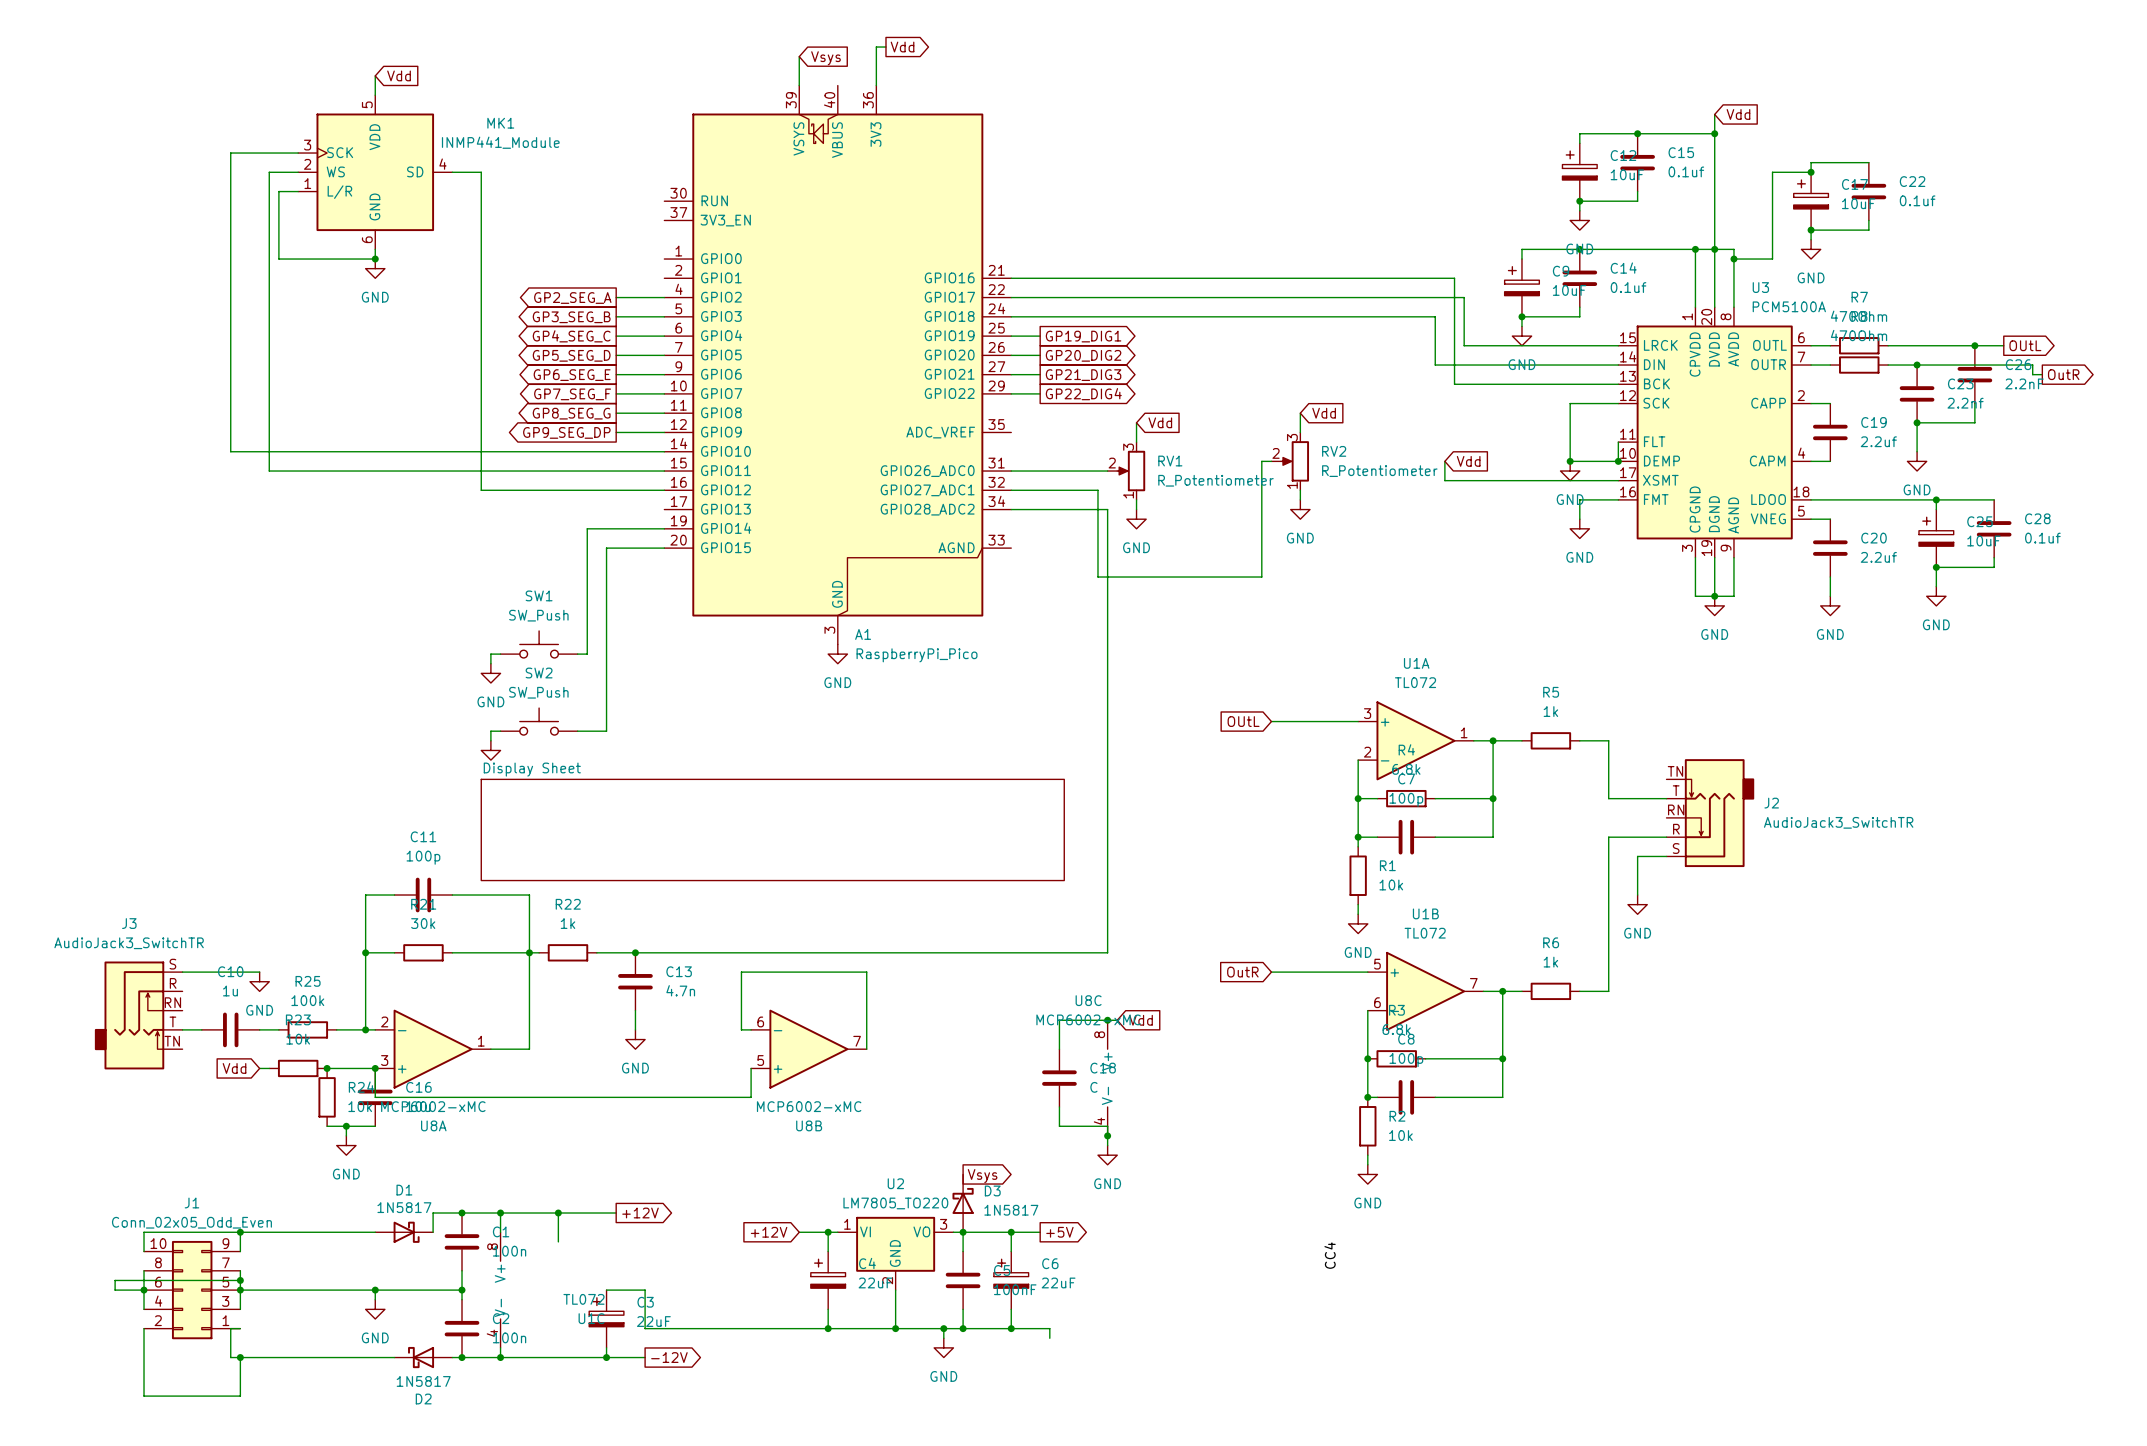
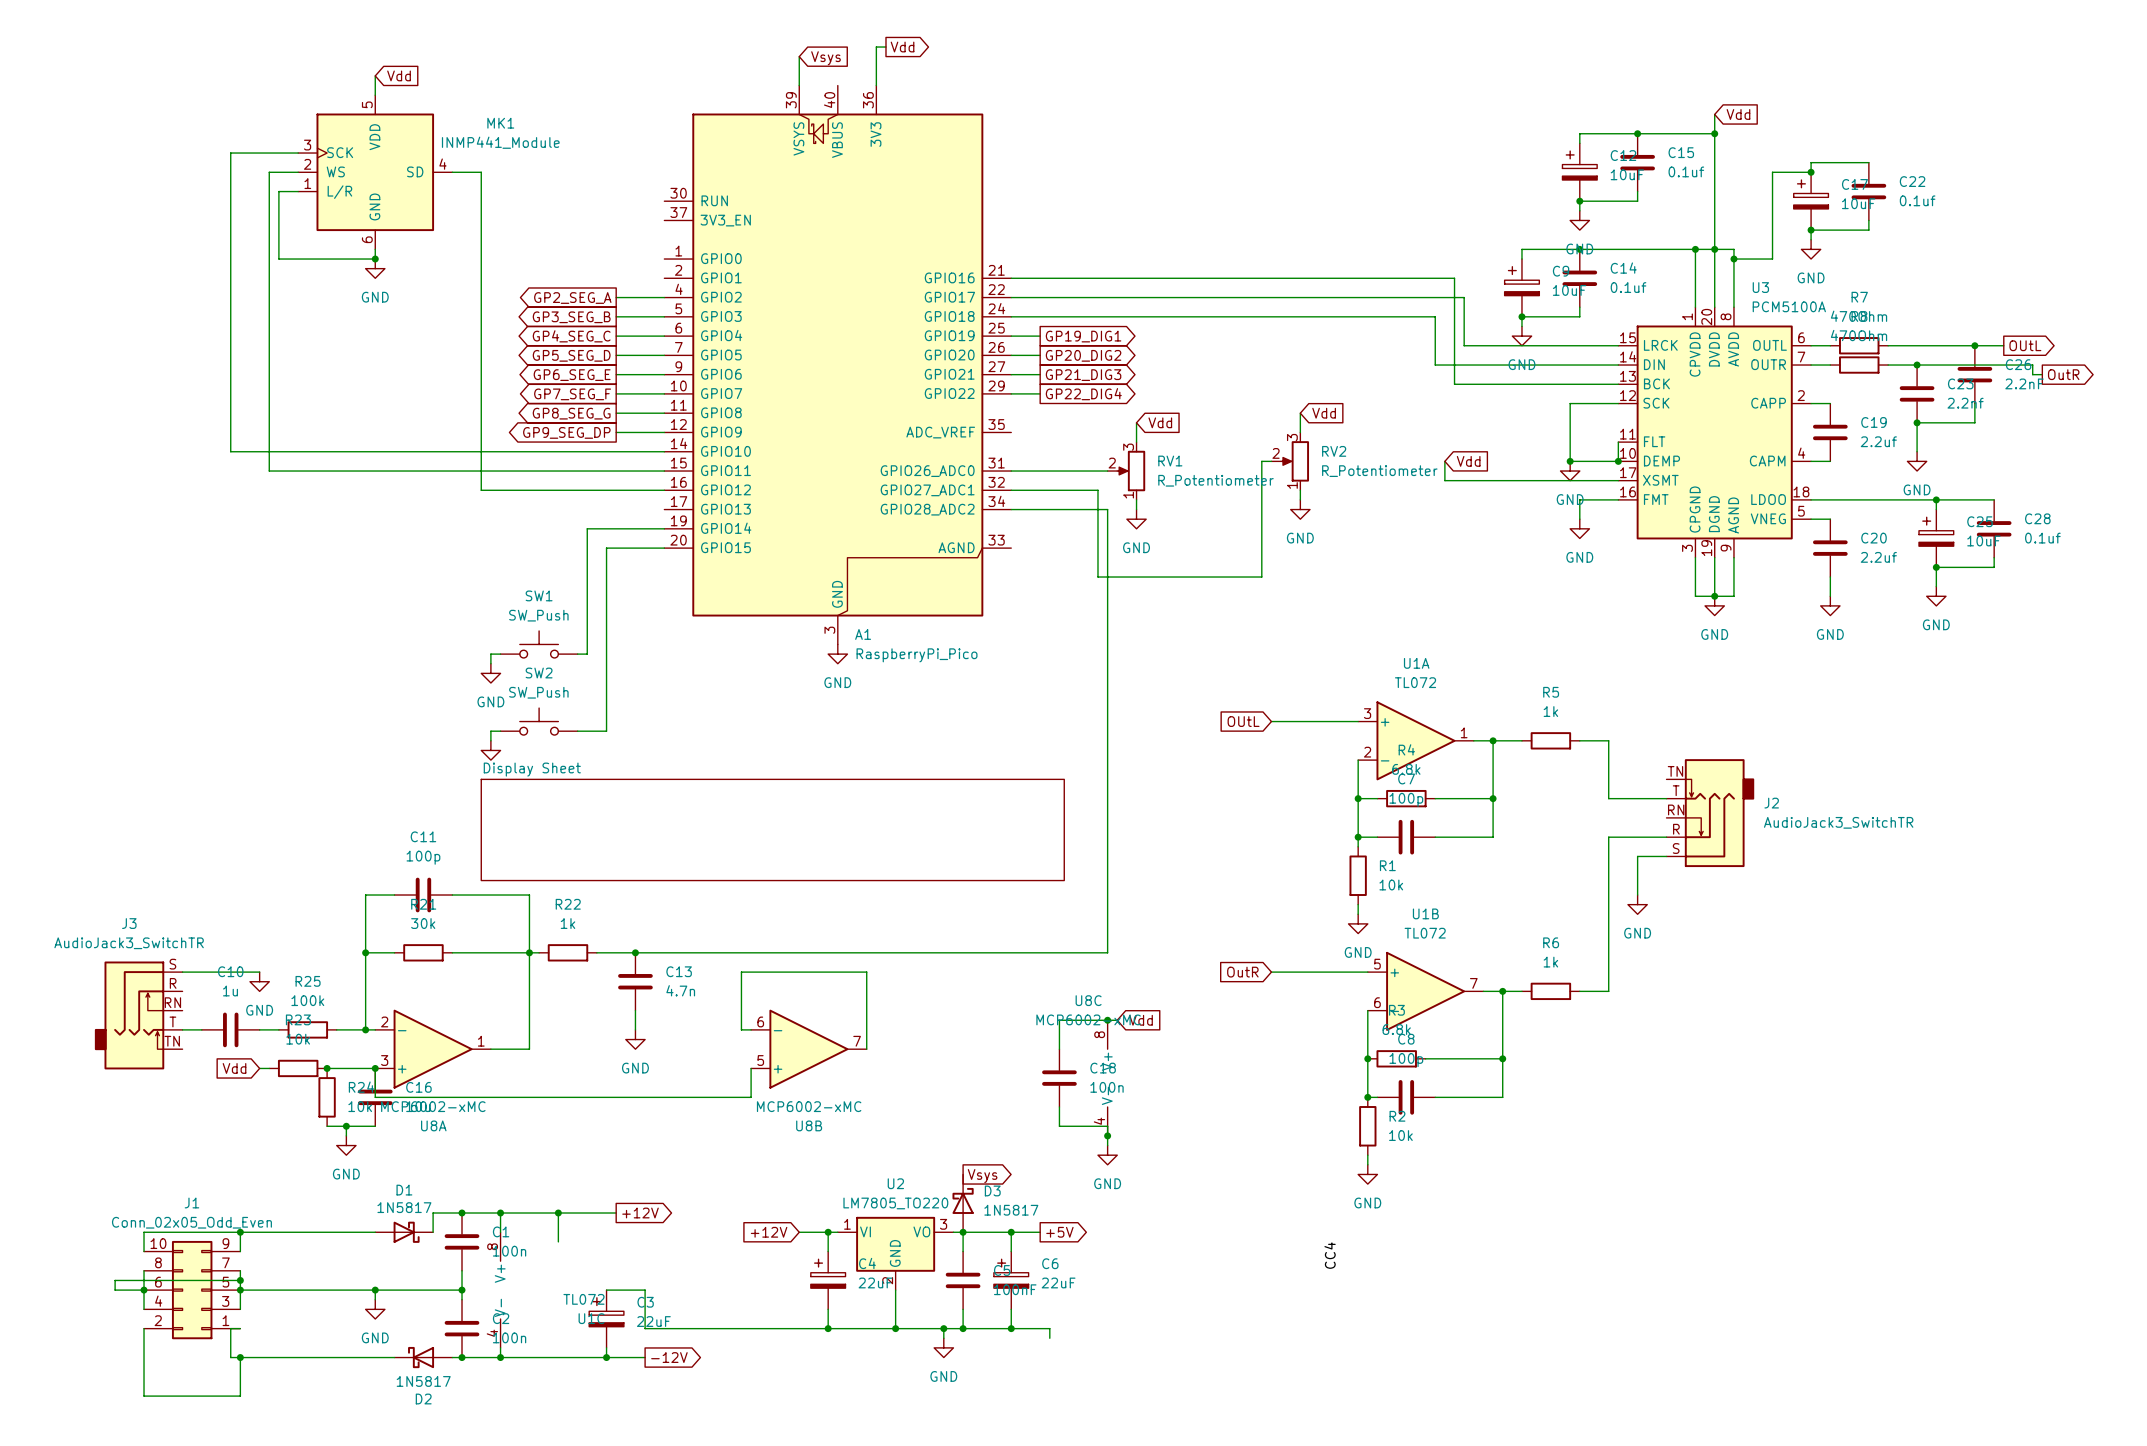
C18 value: C (1093, 1087) -> 100n (1107, 1087)

